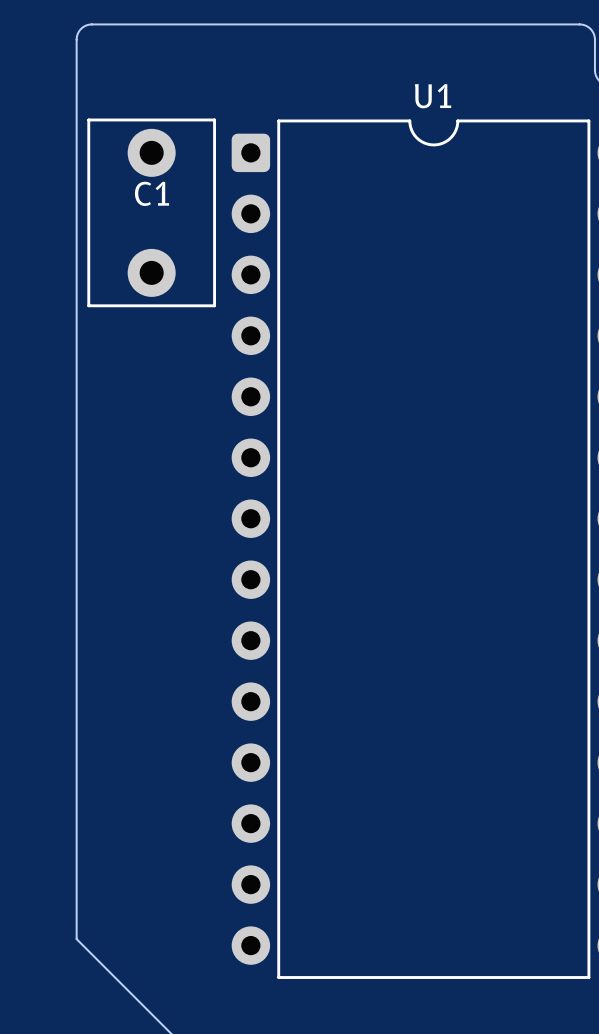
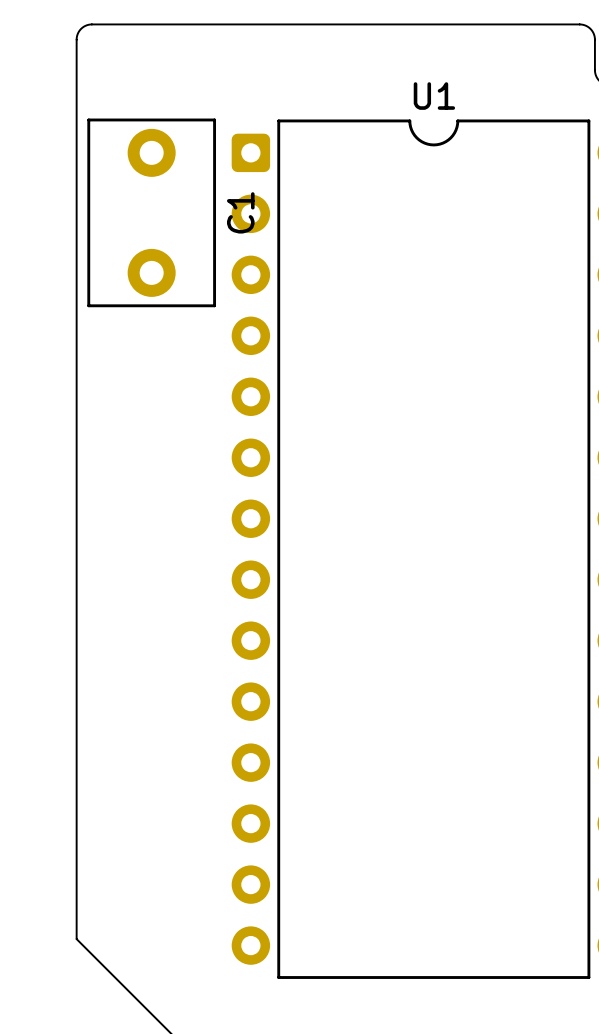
C1 name rotation: 0° (152, 193) -> 90° counterclockwise (240, 212)
C1 name position: C1 (152, 193) -> C1 (240, 212)

